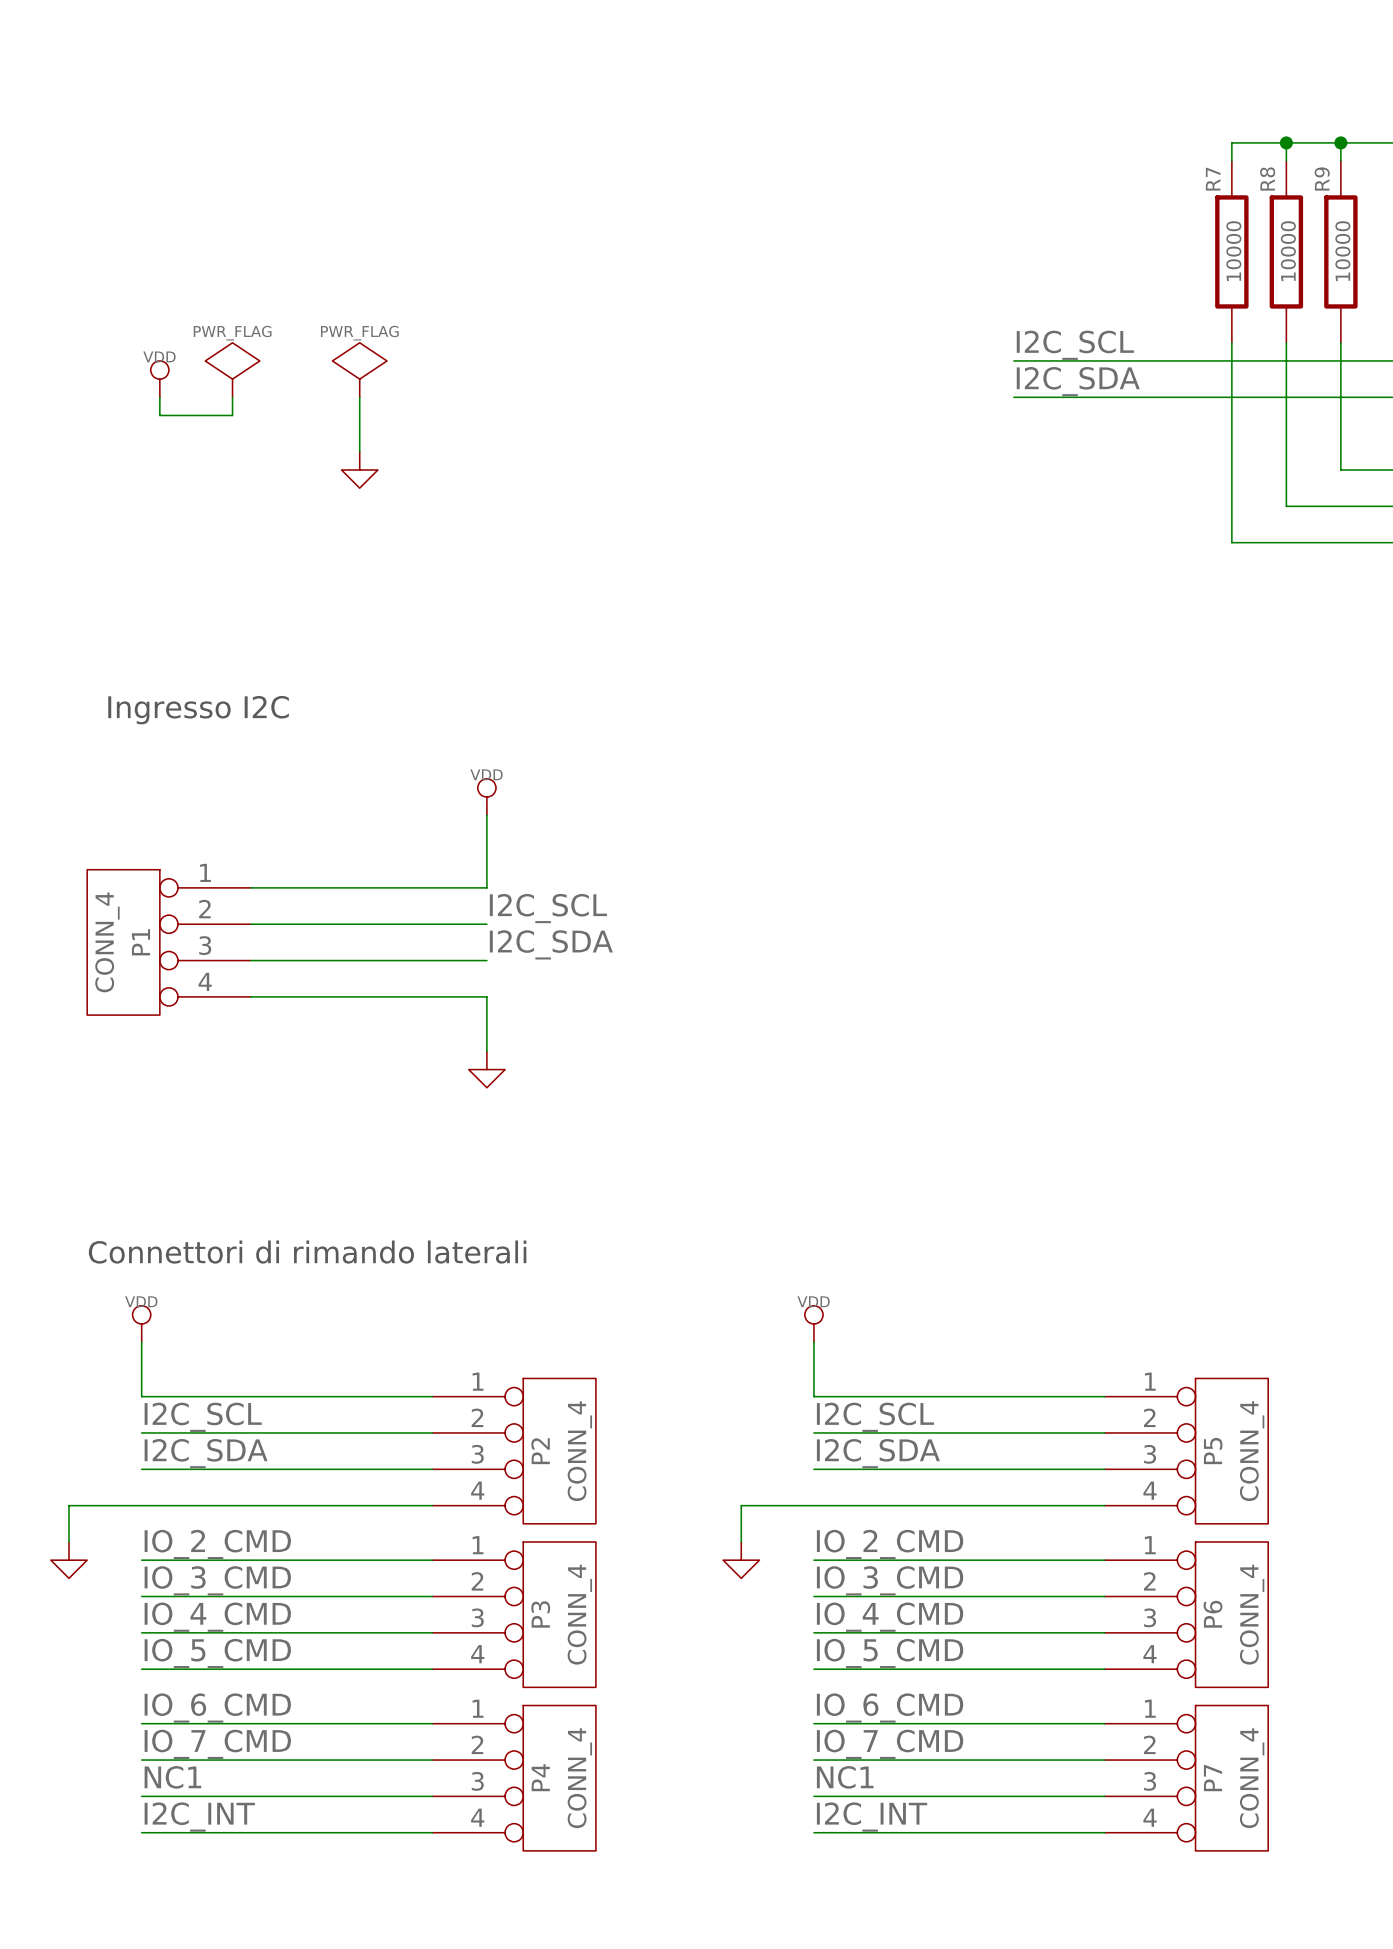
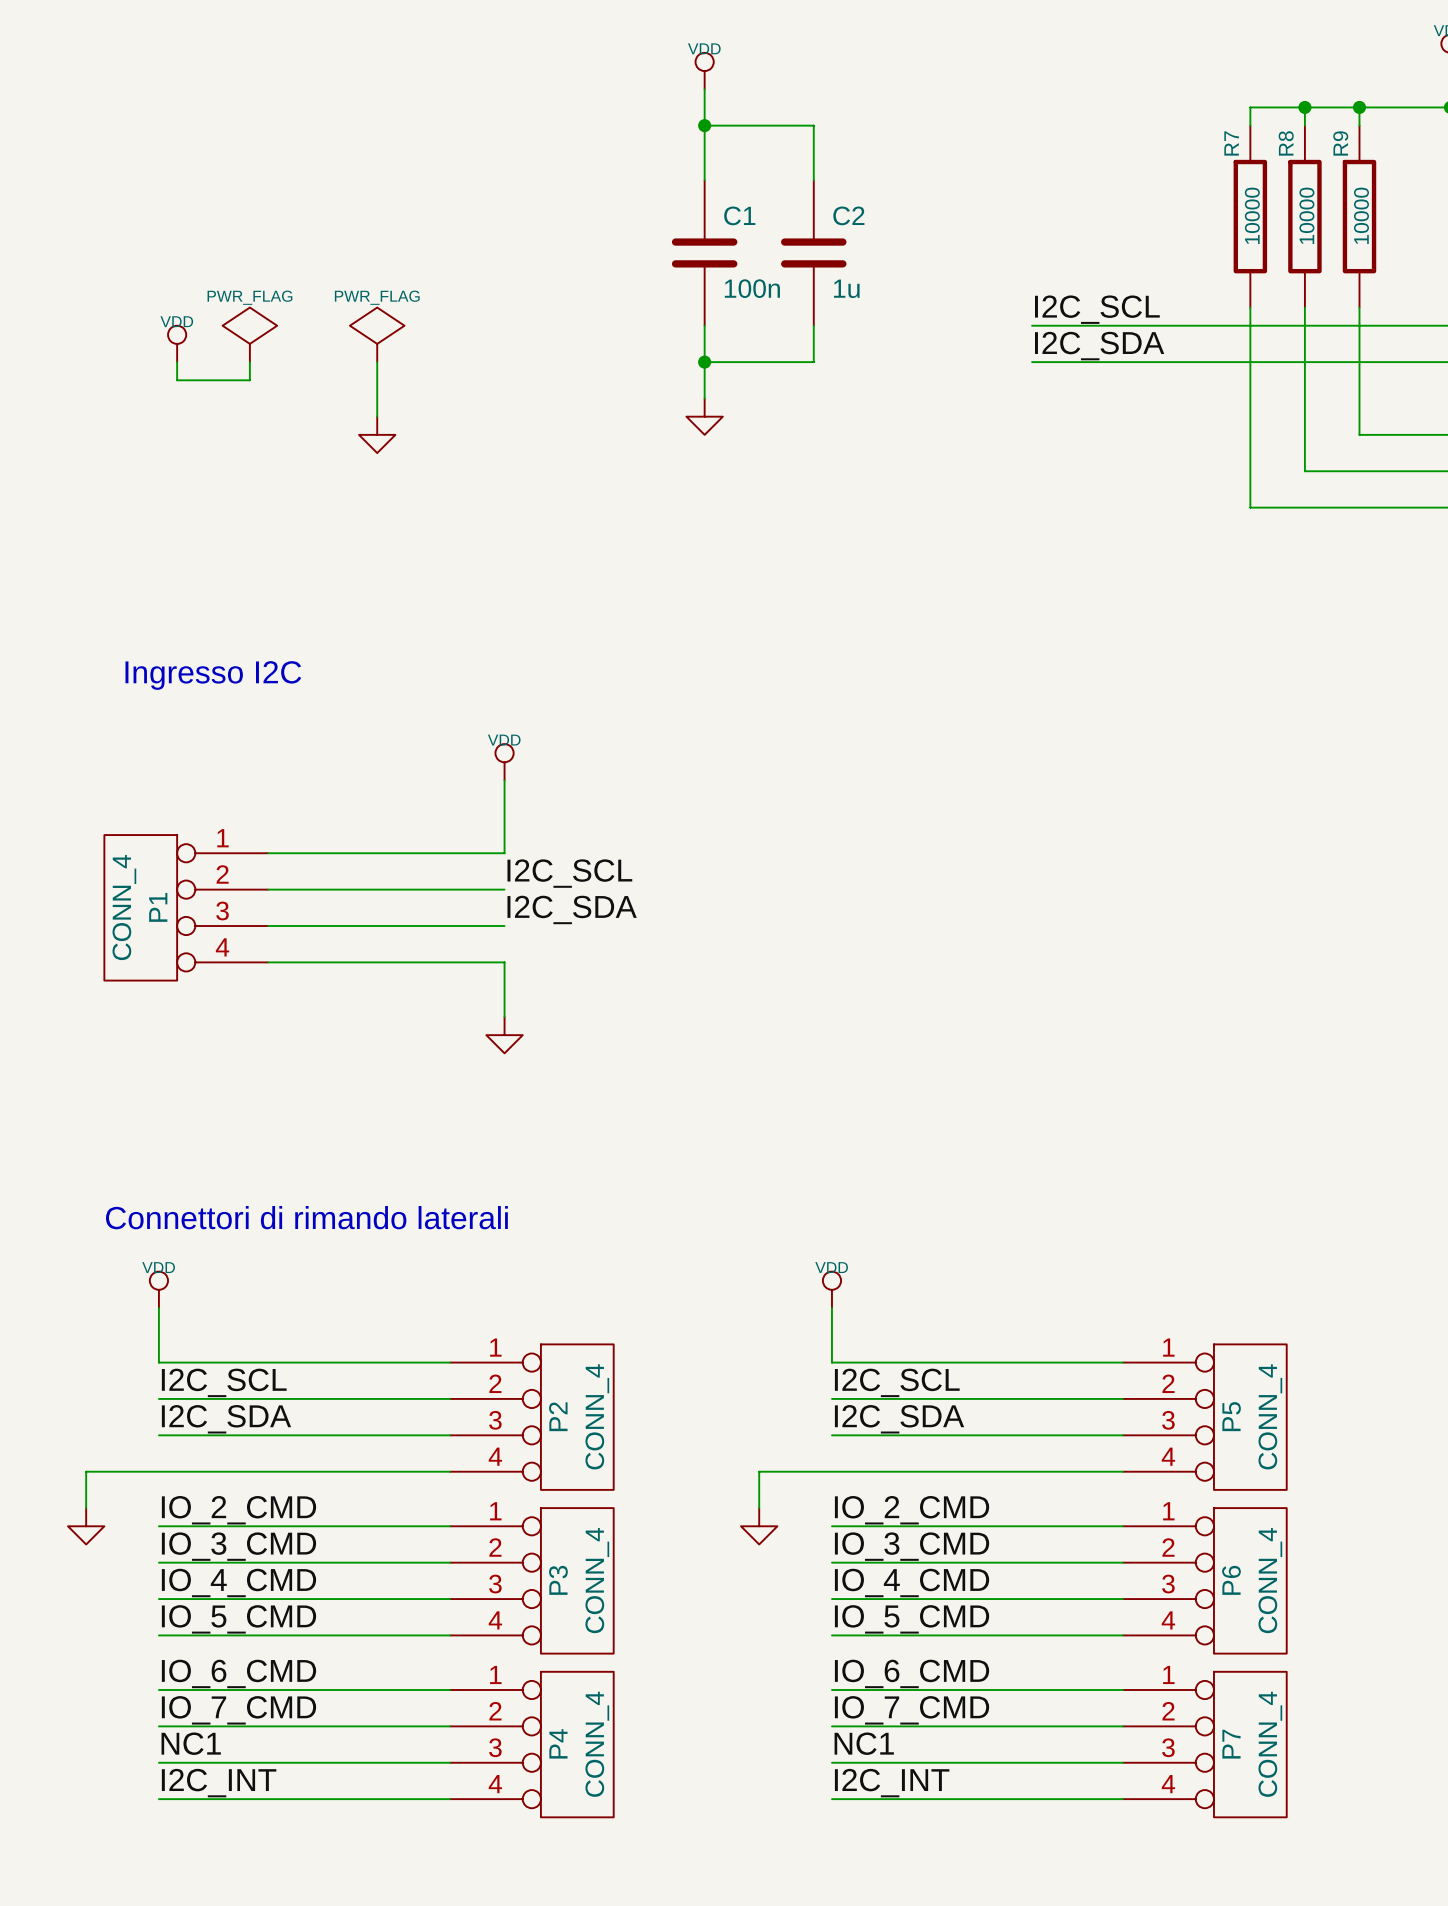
power symbol: none -> VDD (704, 71)
wire: none -> (704, 89) (704, 180)
wire: none -> (704, 125) (813, 125) (813, 180)
junction: none -> (704, 125)
C1: none -> 100n (704, 252)
C2: none -> 1u (813, 252)
wire: none -> (704, 325) (704, 398)
wire: none -> (813, 325) (813, 362) (704, 362)
junction: none -> (704, 362)
power symbol: none -> (704, 416)

